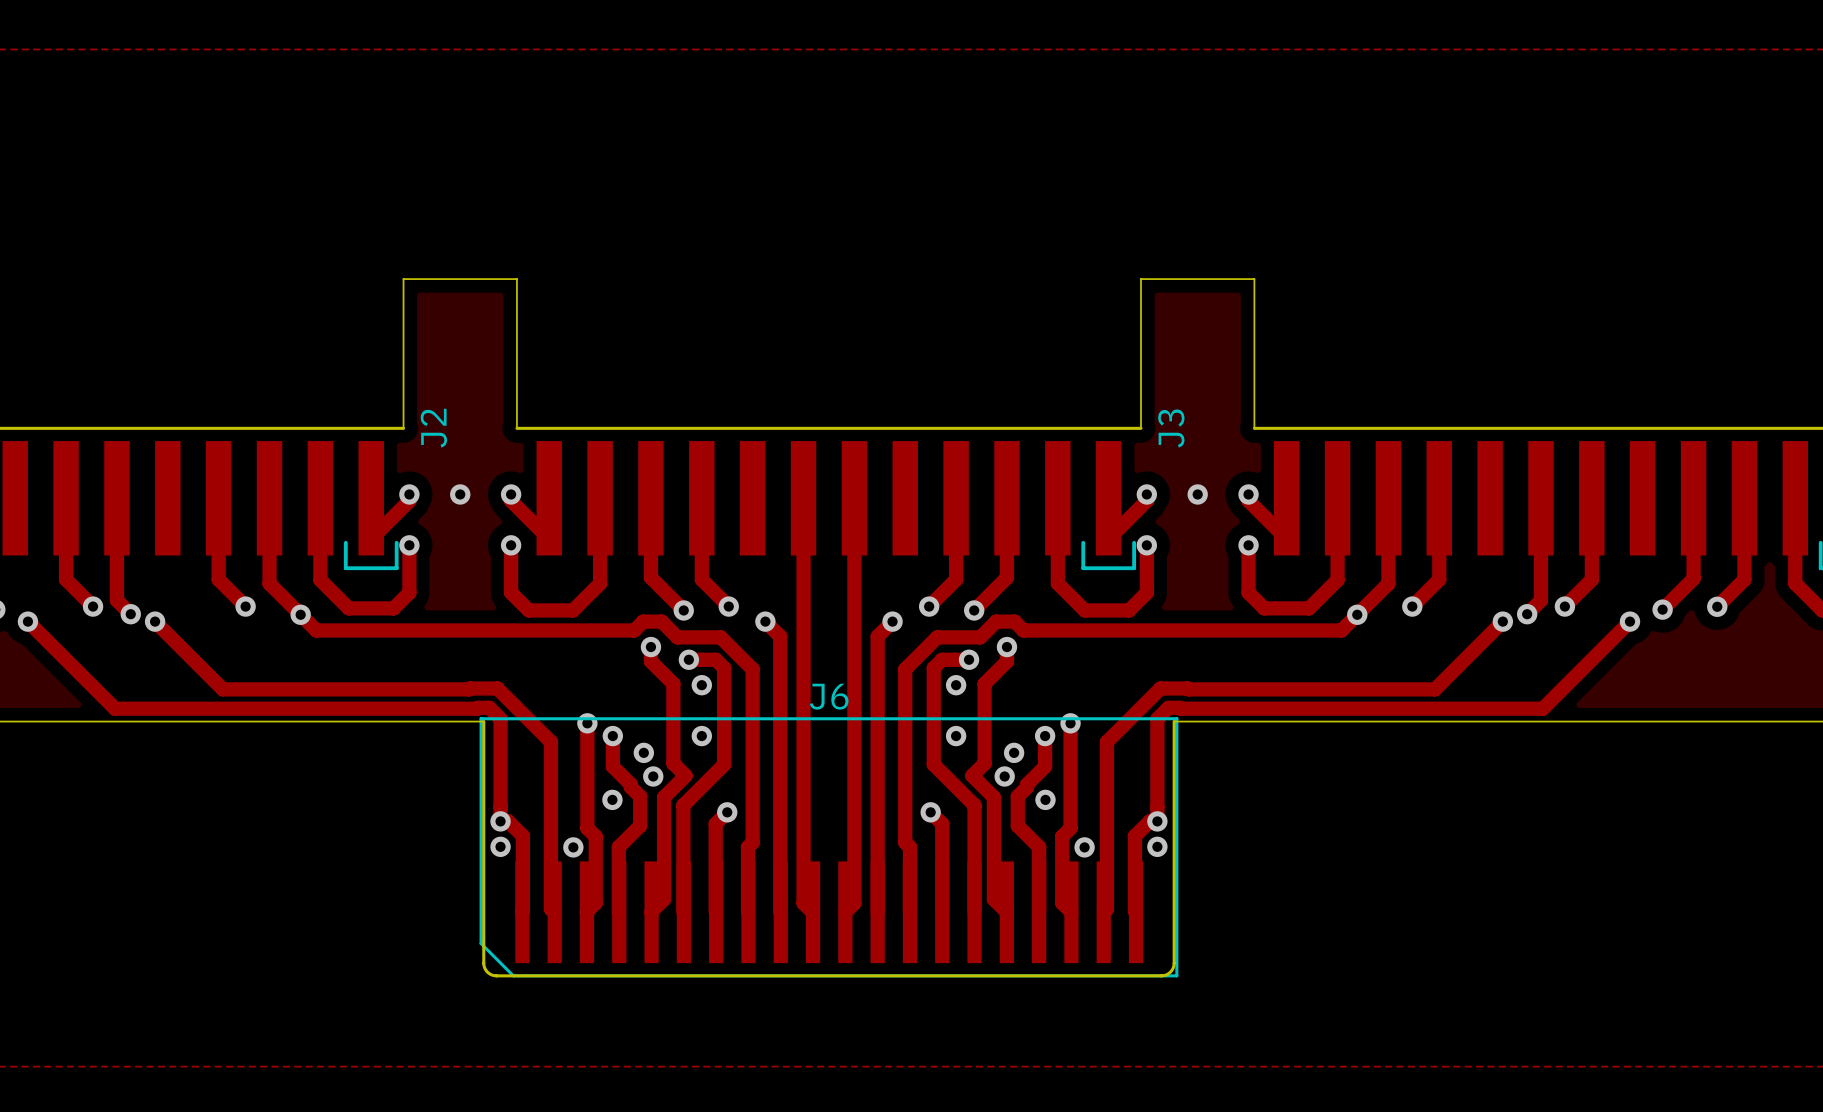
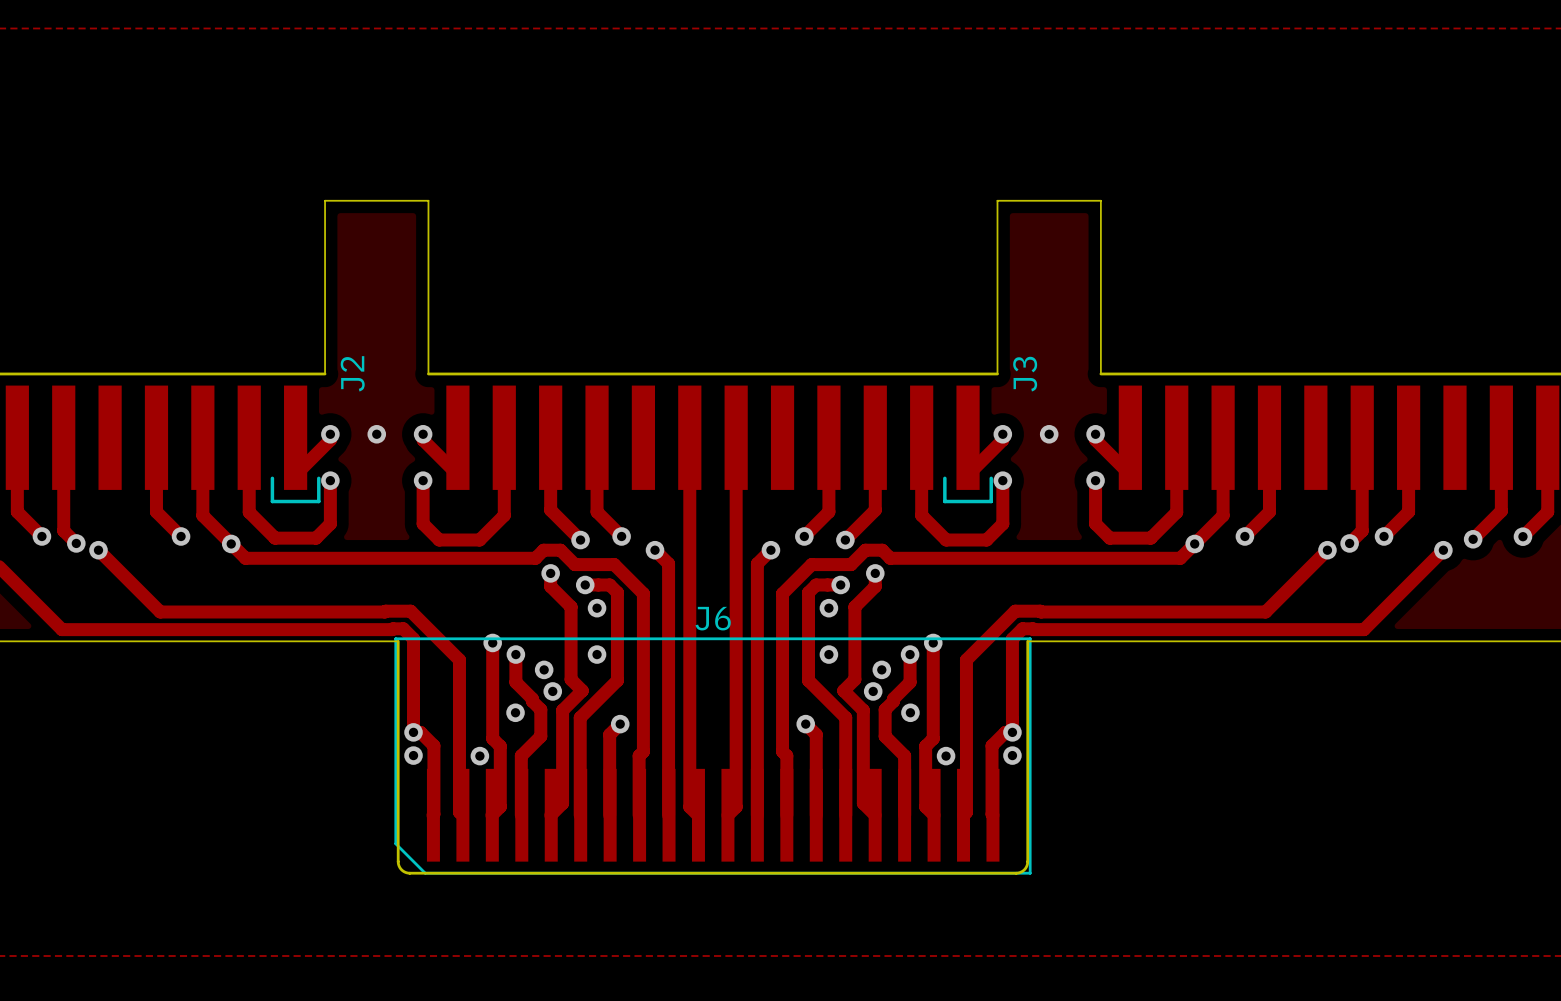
board edge: (403, 279) (516, 279) -> (325, 237) (325, 200) (428, 200) (428, 237)
board edge: (1140, 279) (1254, 279) -> (997, 237) (997, 200) (1100, 200) (1100, 237)

